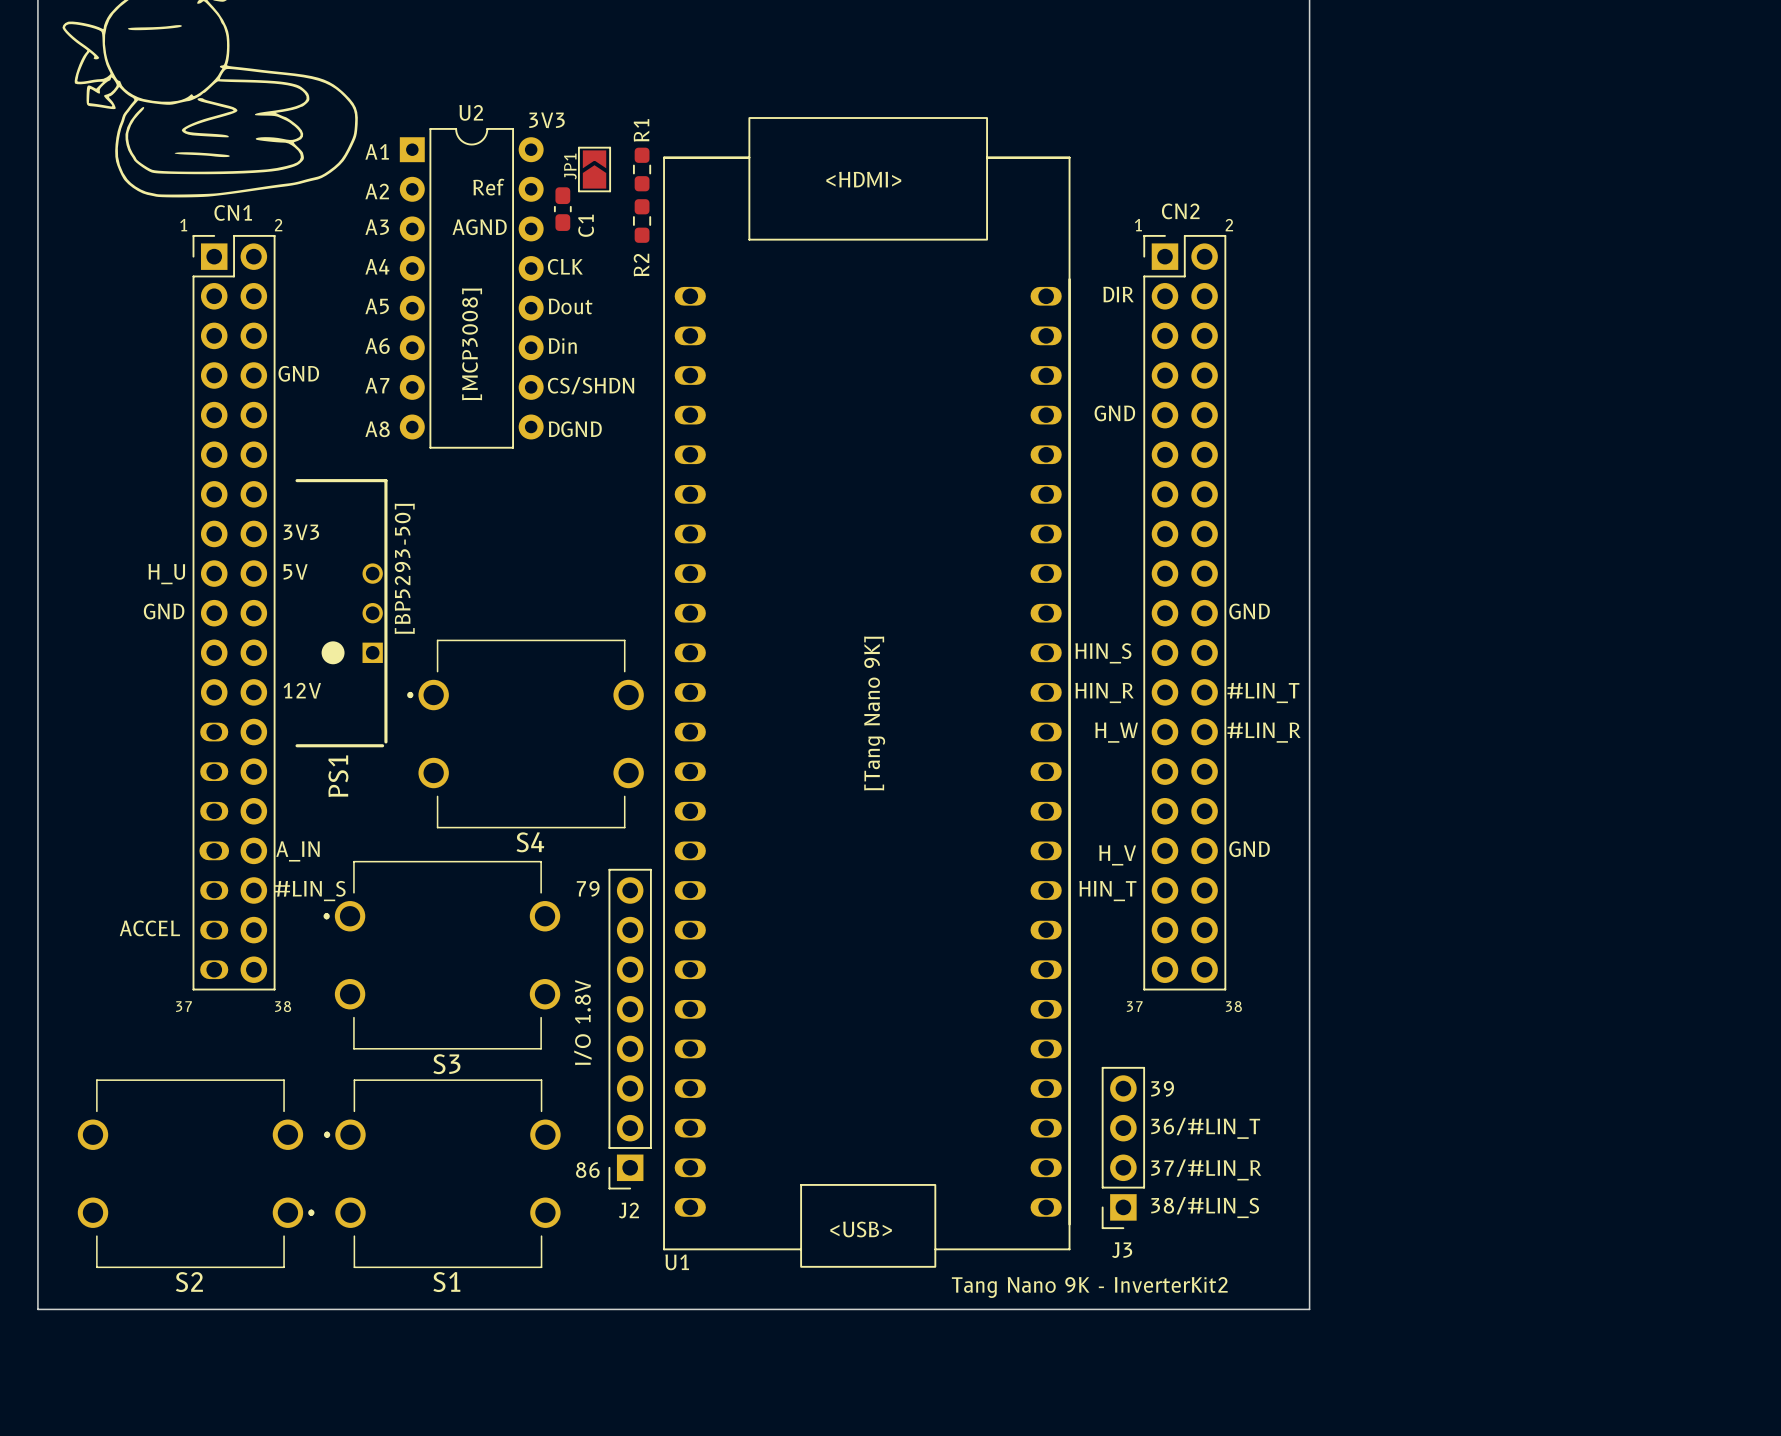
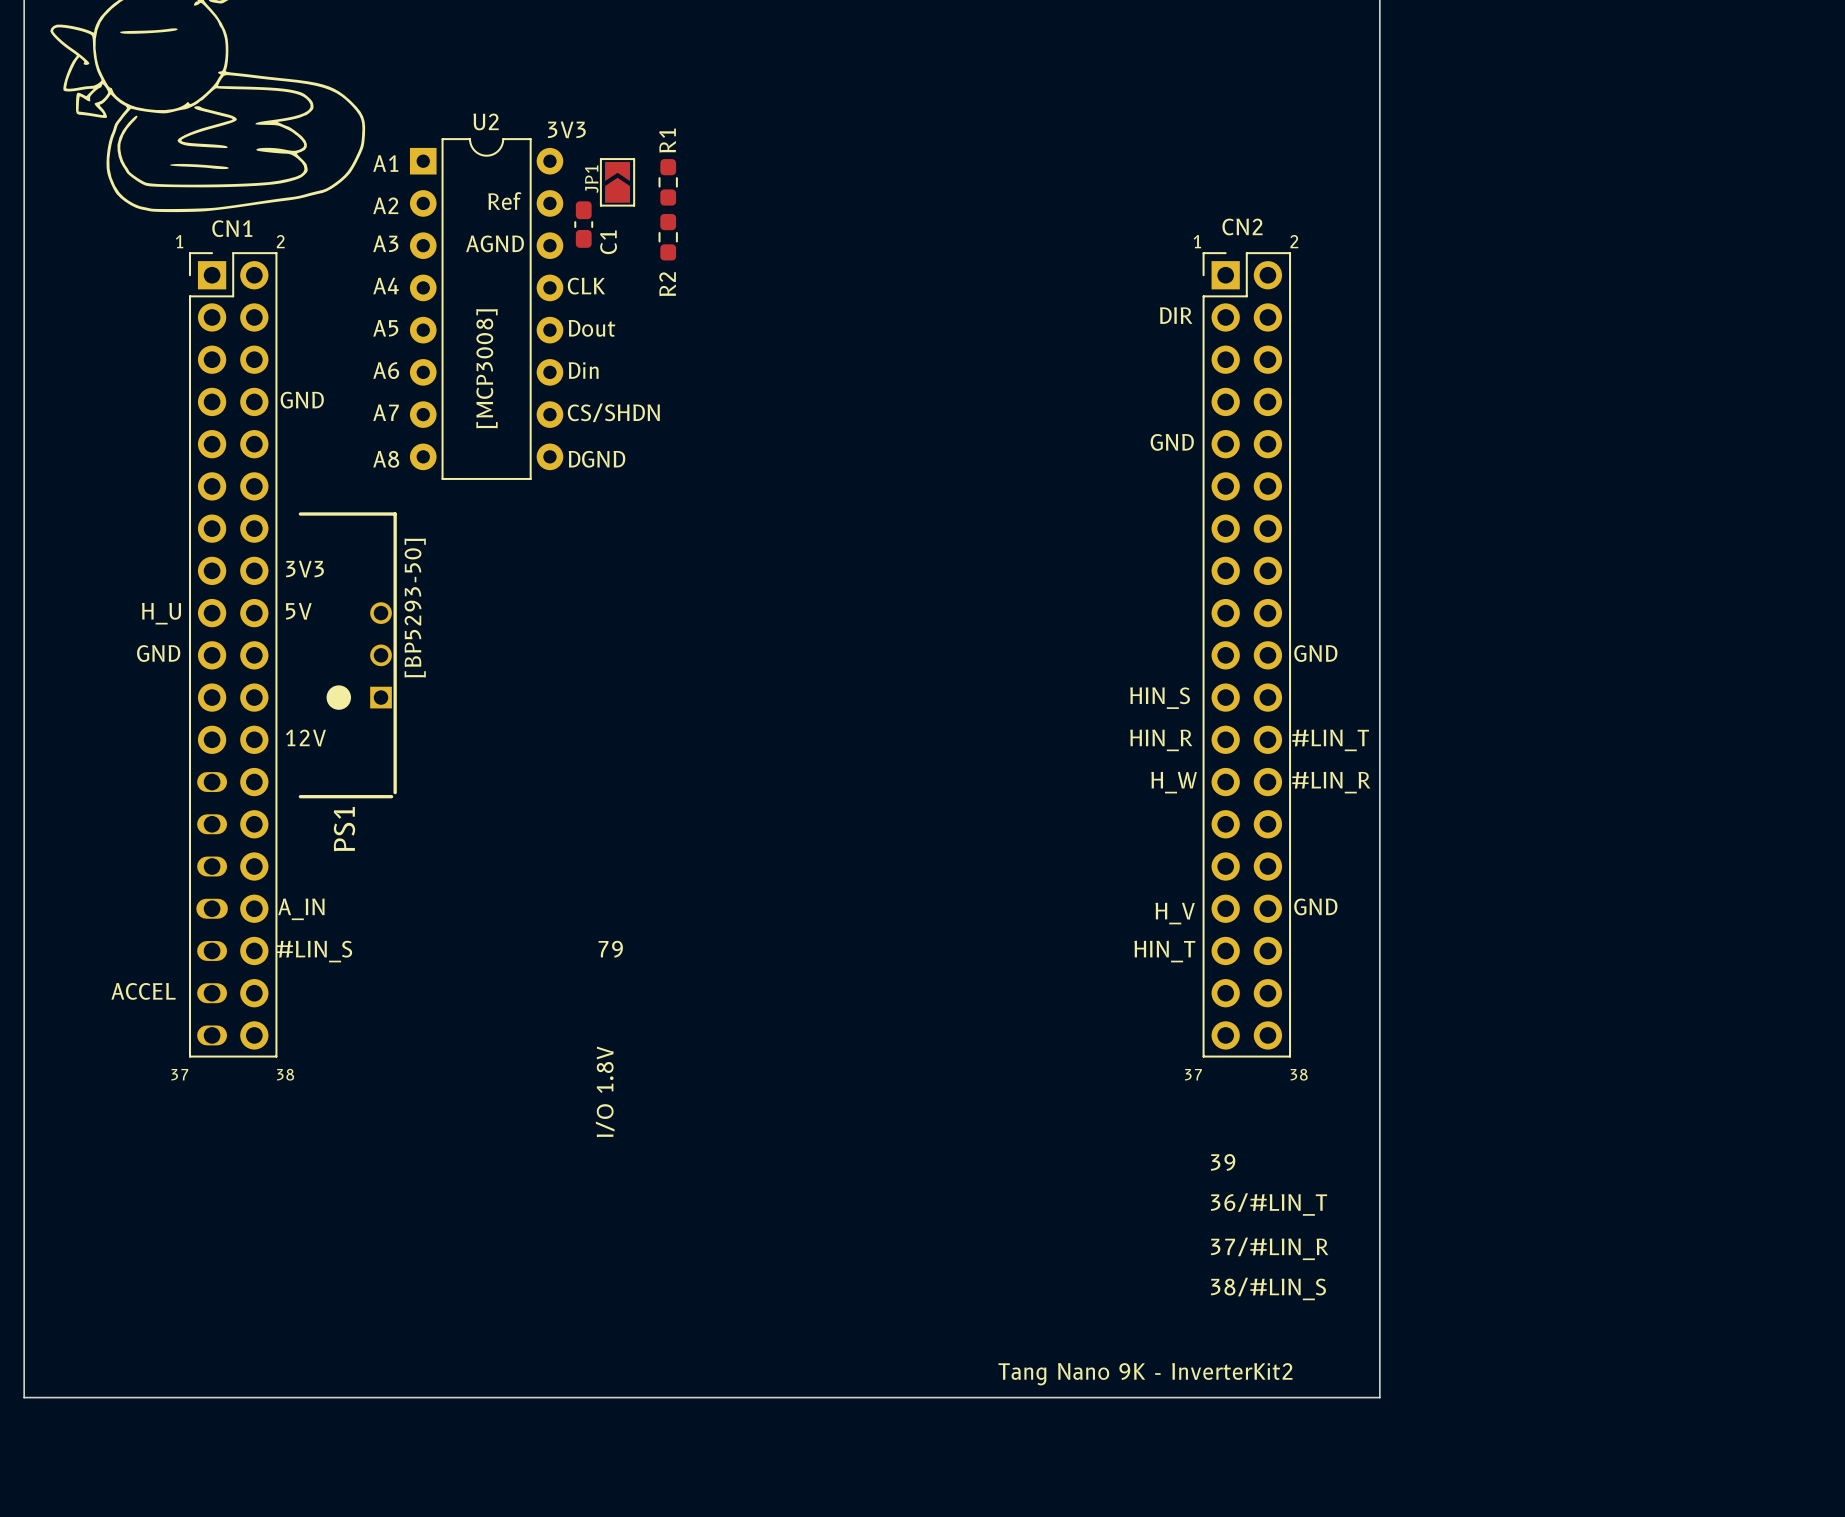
text: <HDMI> (863, 179) -> none
U1: (866, 692) -> none
text: [Tang Nano 9K] (874, 713) -> none
S4: (525, 734) -> none
S3: (441, 955) -> none
J2: (630, 1029) -> none
J3: (1123, 1147) -> none
text: 86 (587, 1170) -> none
S2: (196, 1173) -> none
S1: (442, 1173) -> none
text: <USB> (861, 1229) -> none

